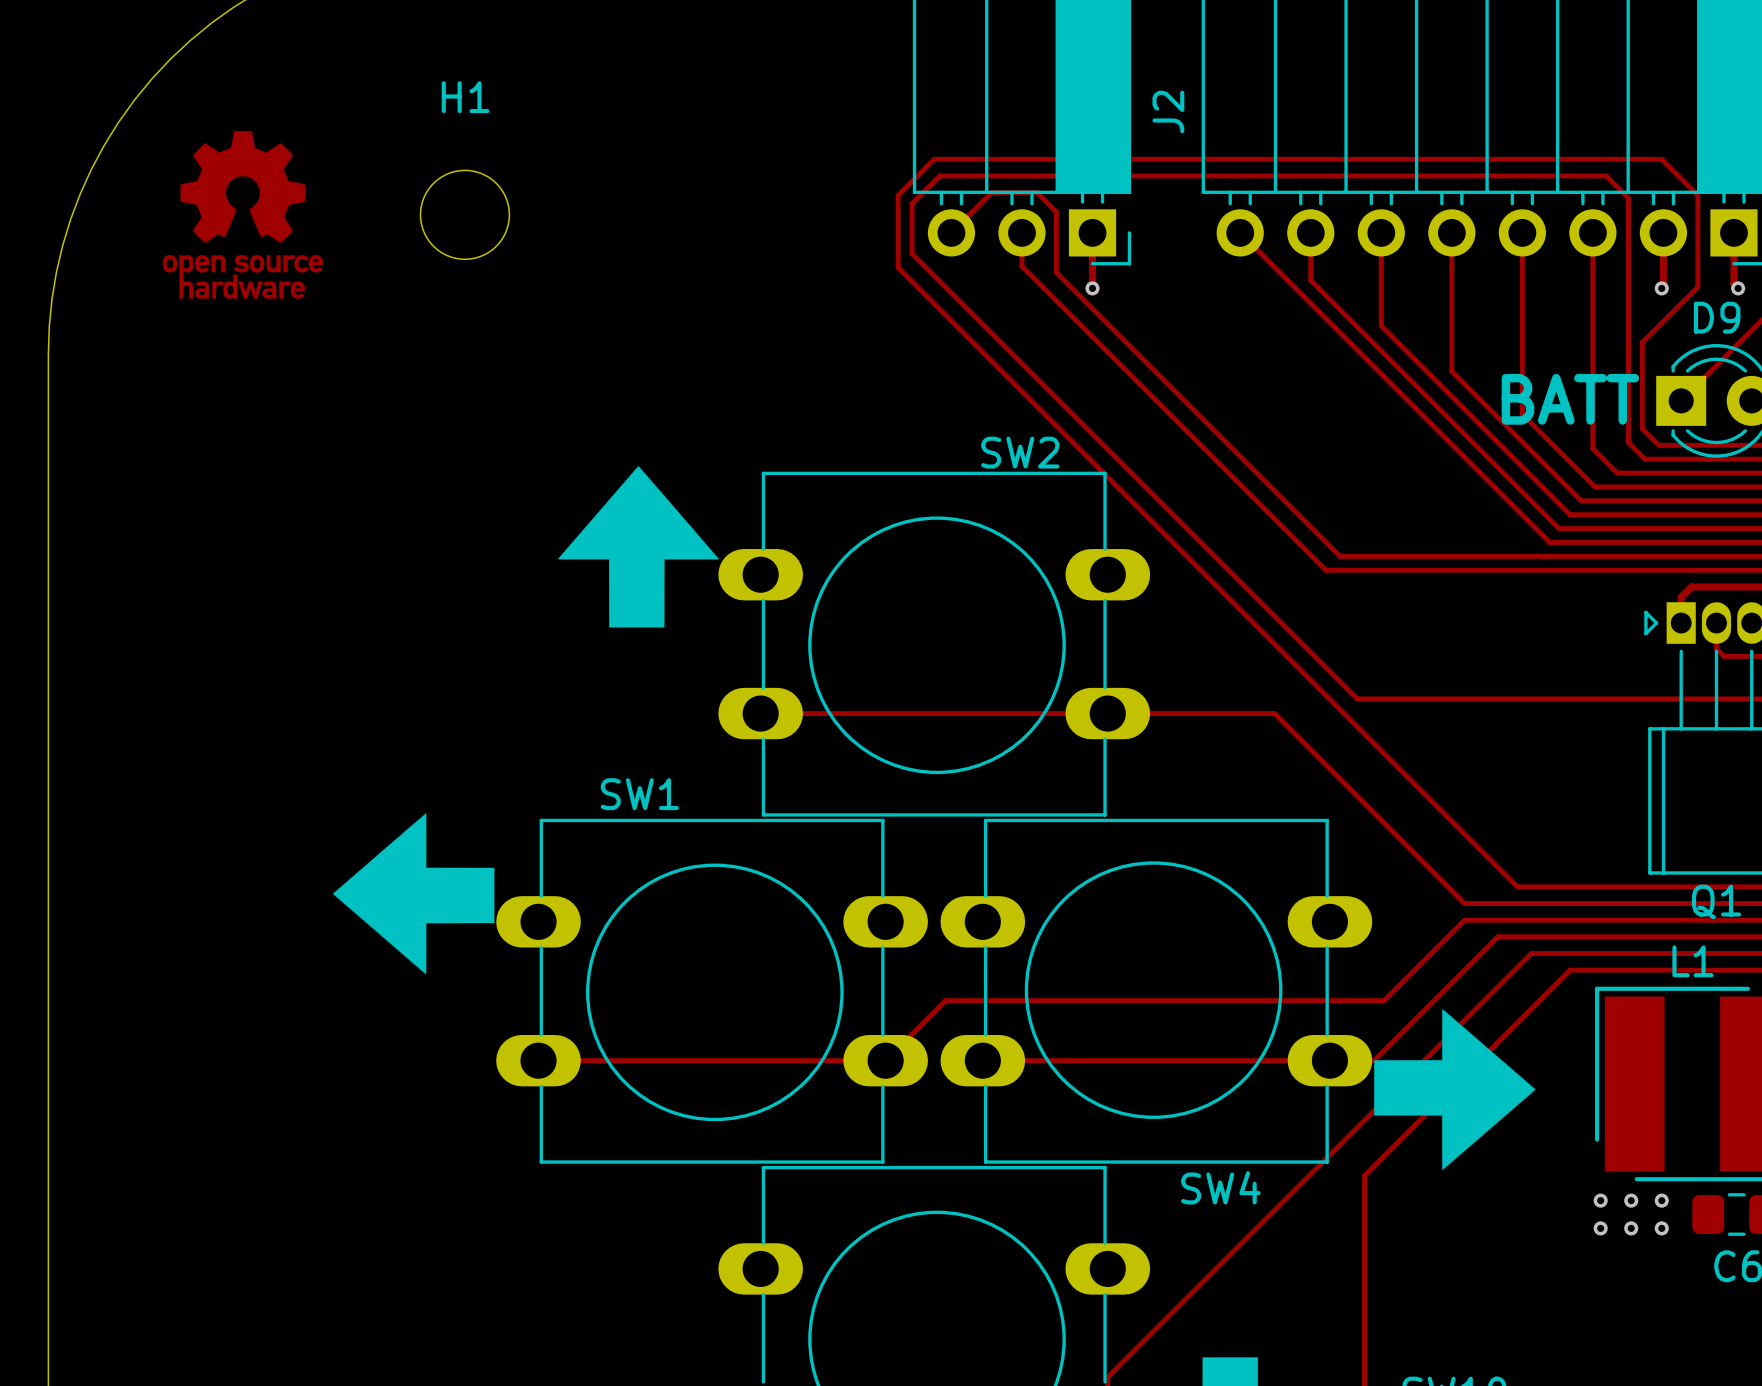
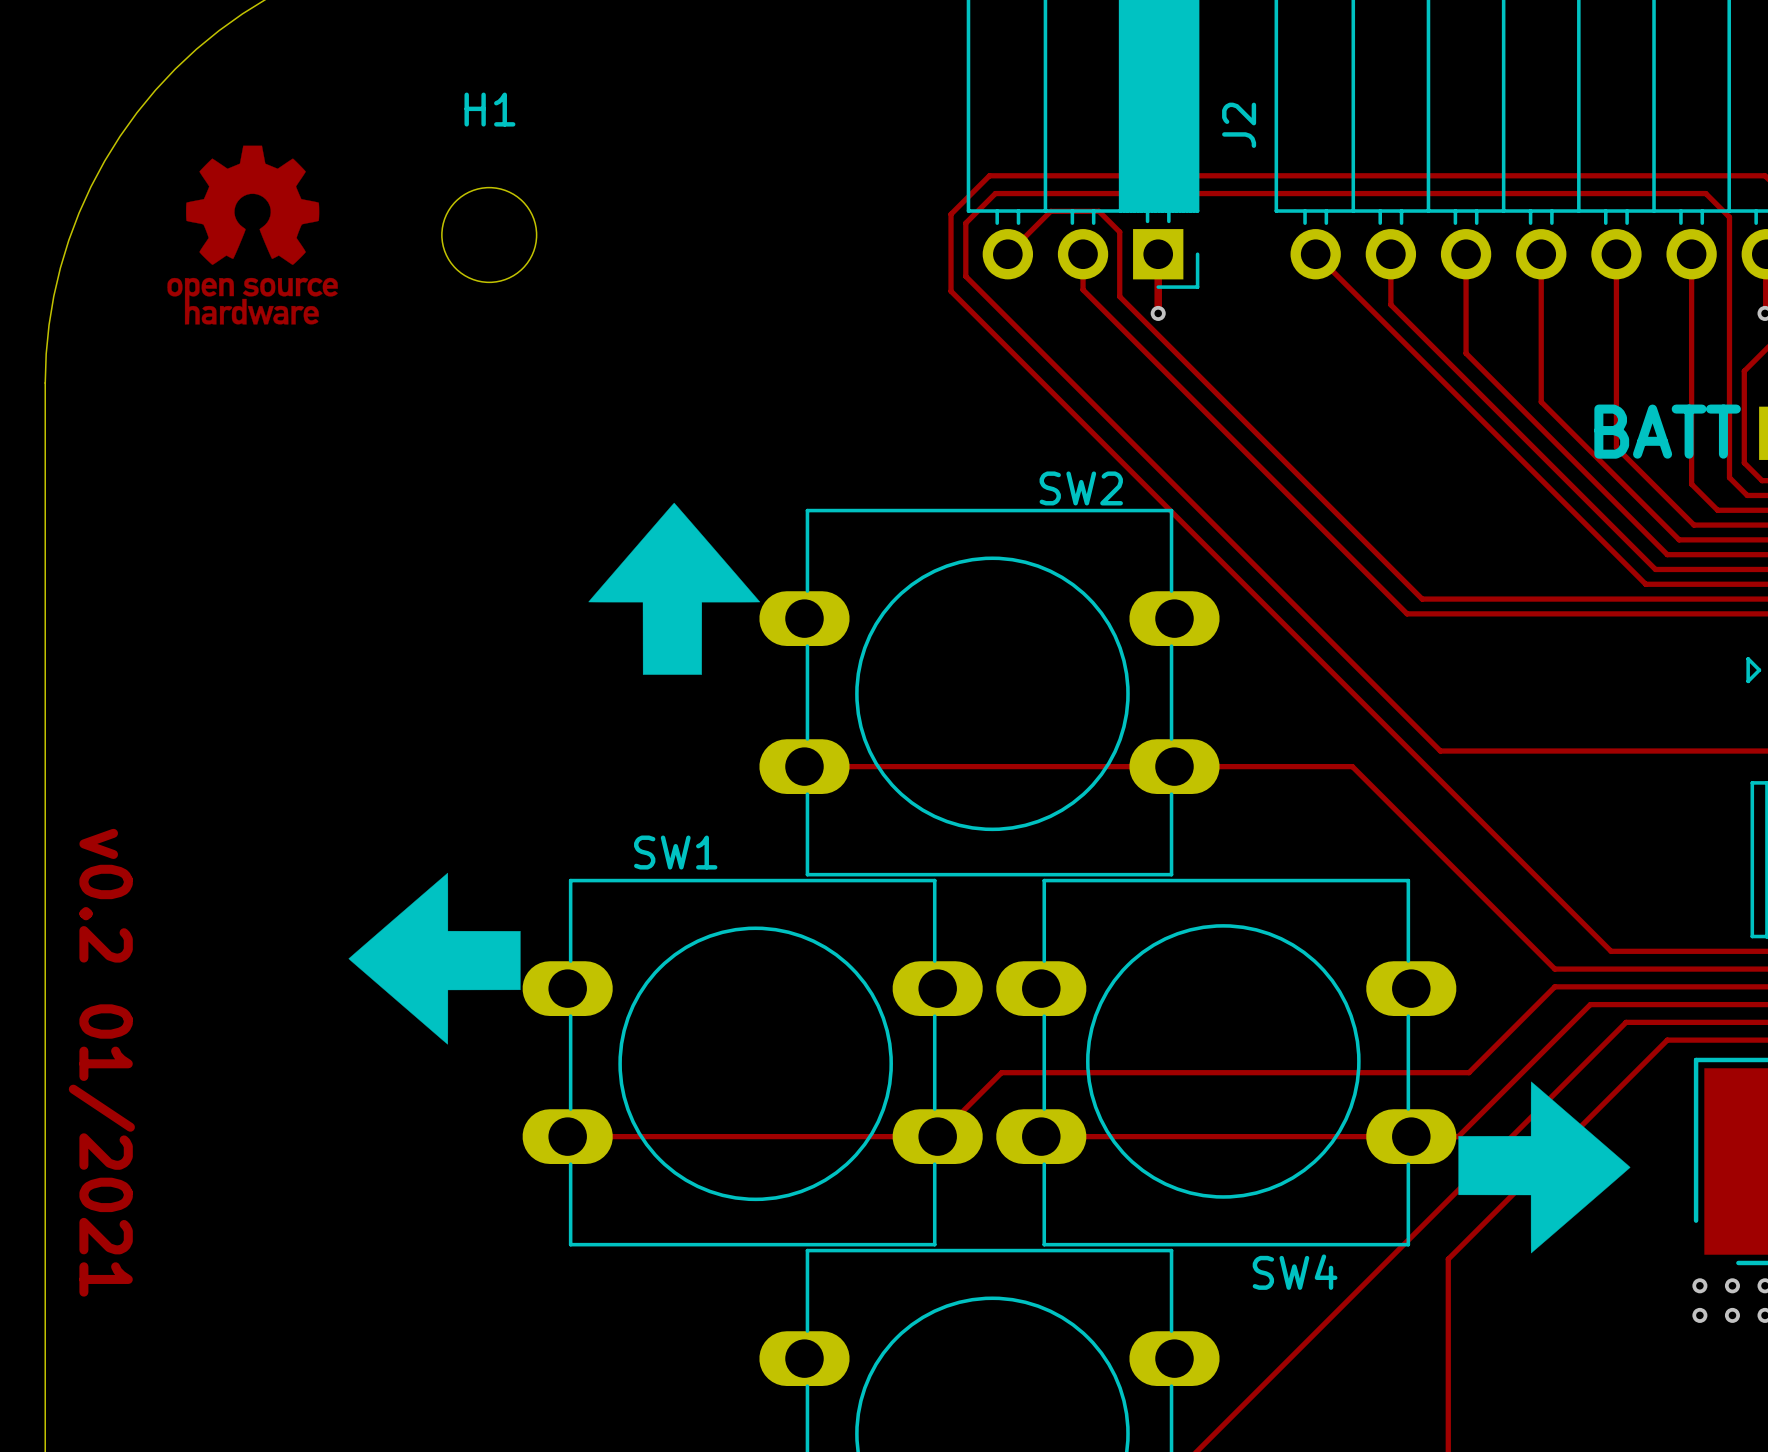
text: none -> v0.2 01/2021 (101, 1062)

